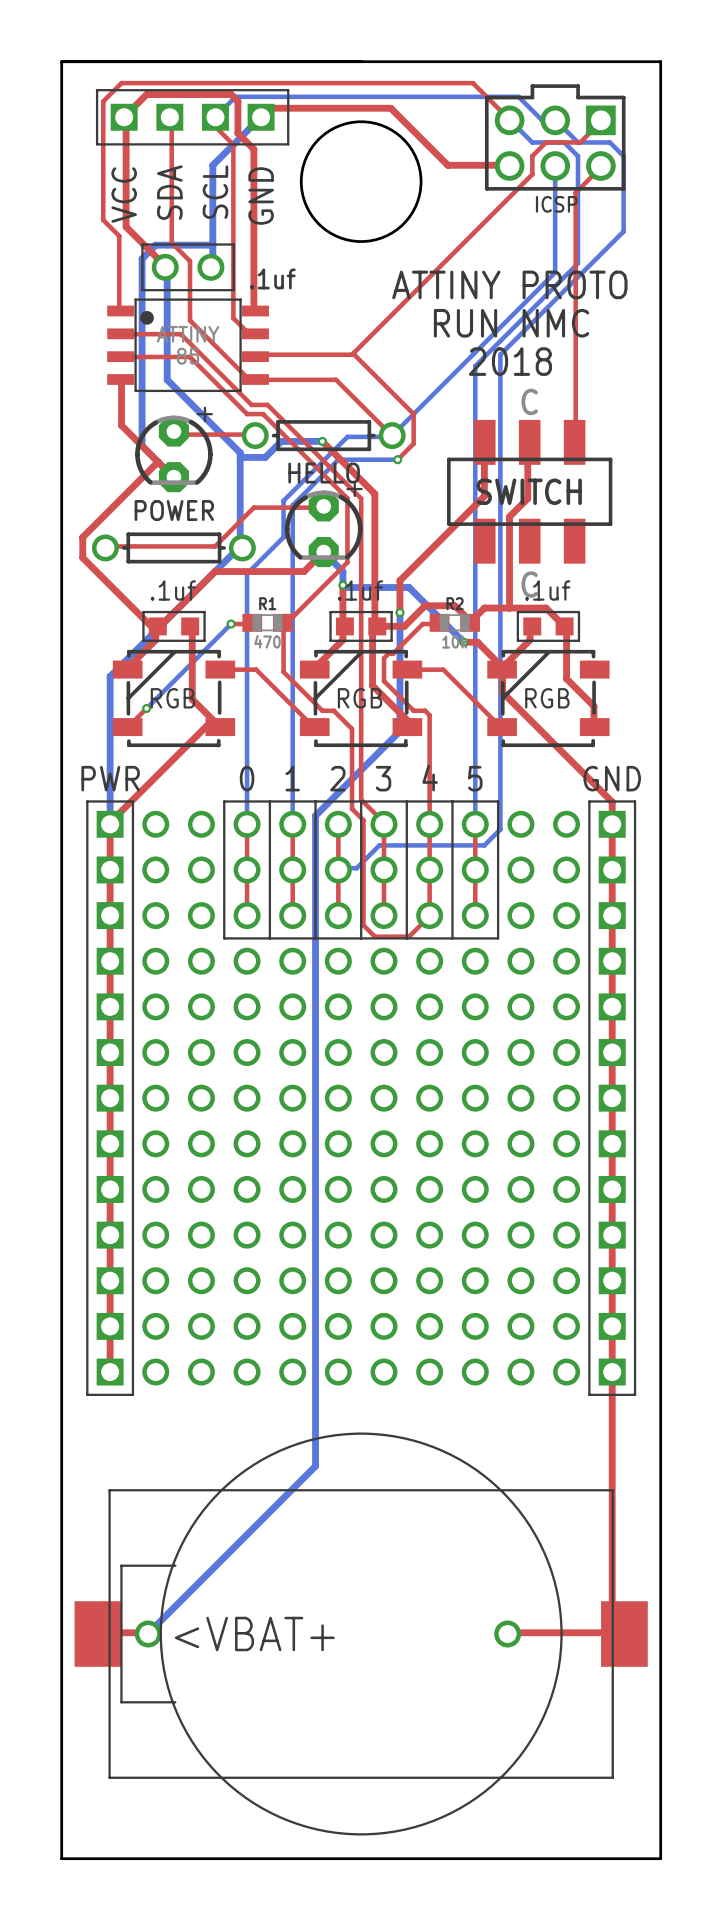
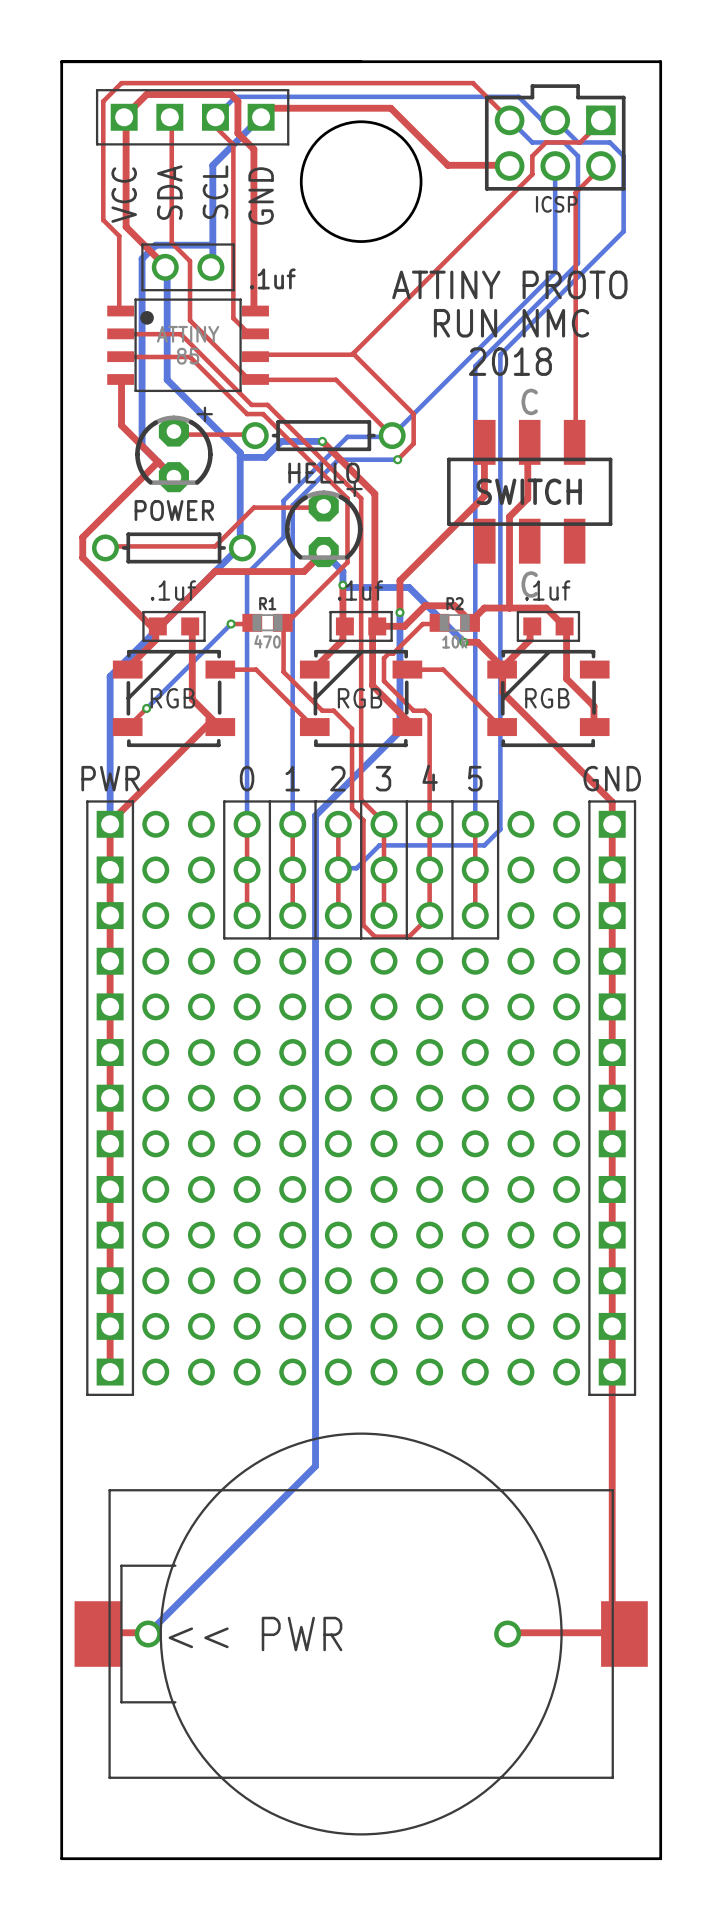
part text: <VBAT+ (254, 1634) -> << PWR (255, 1634)

